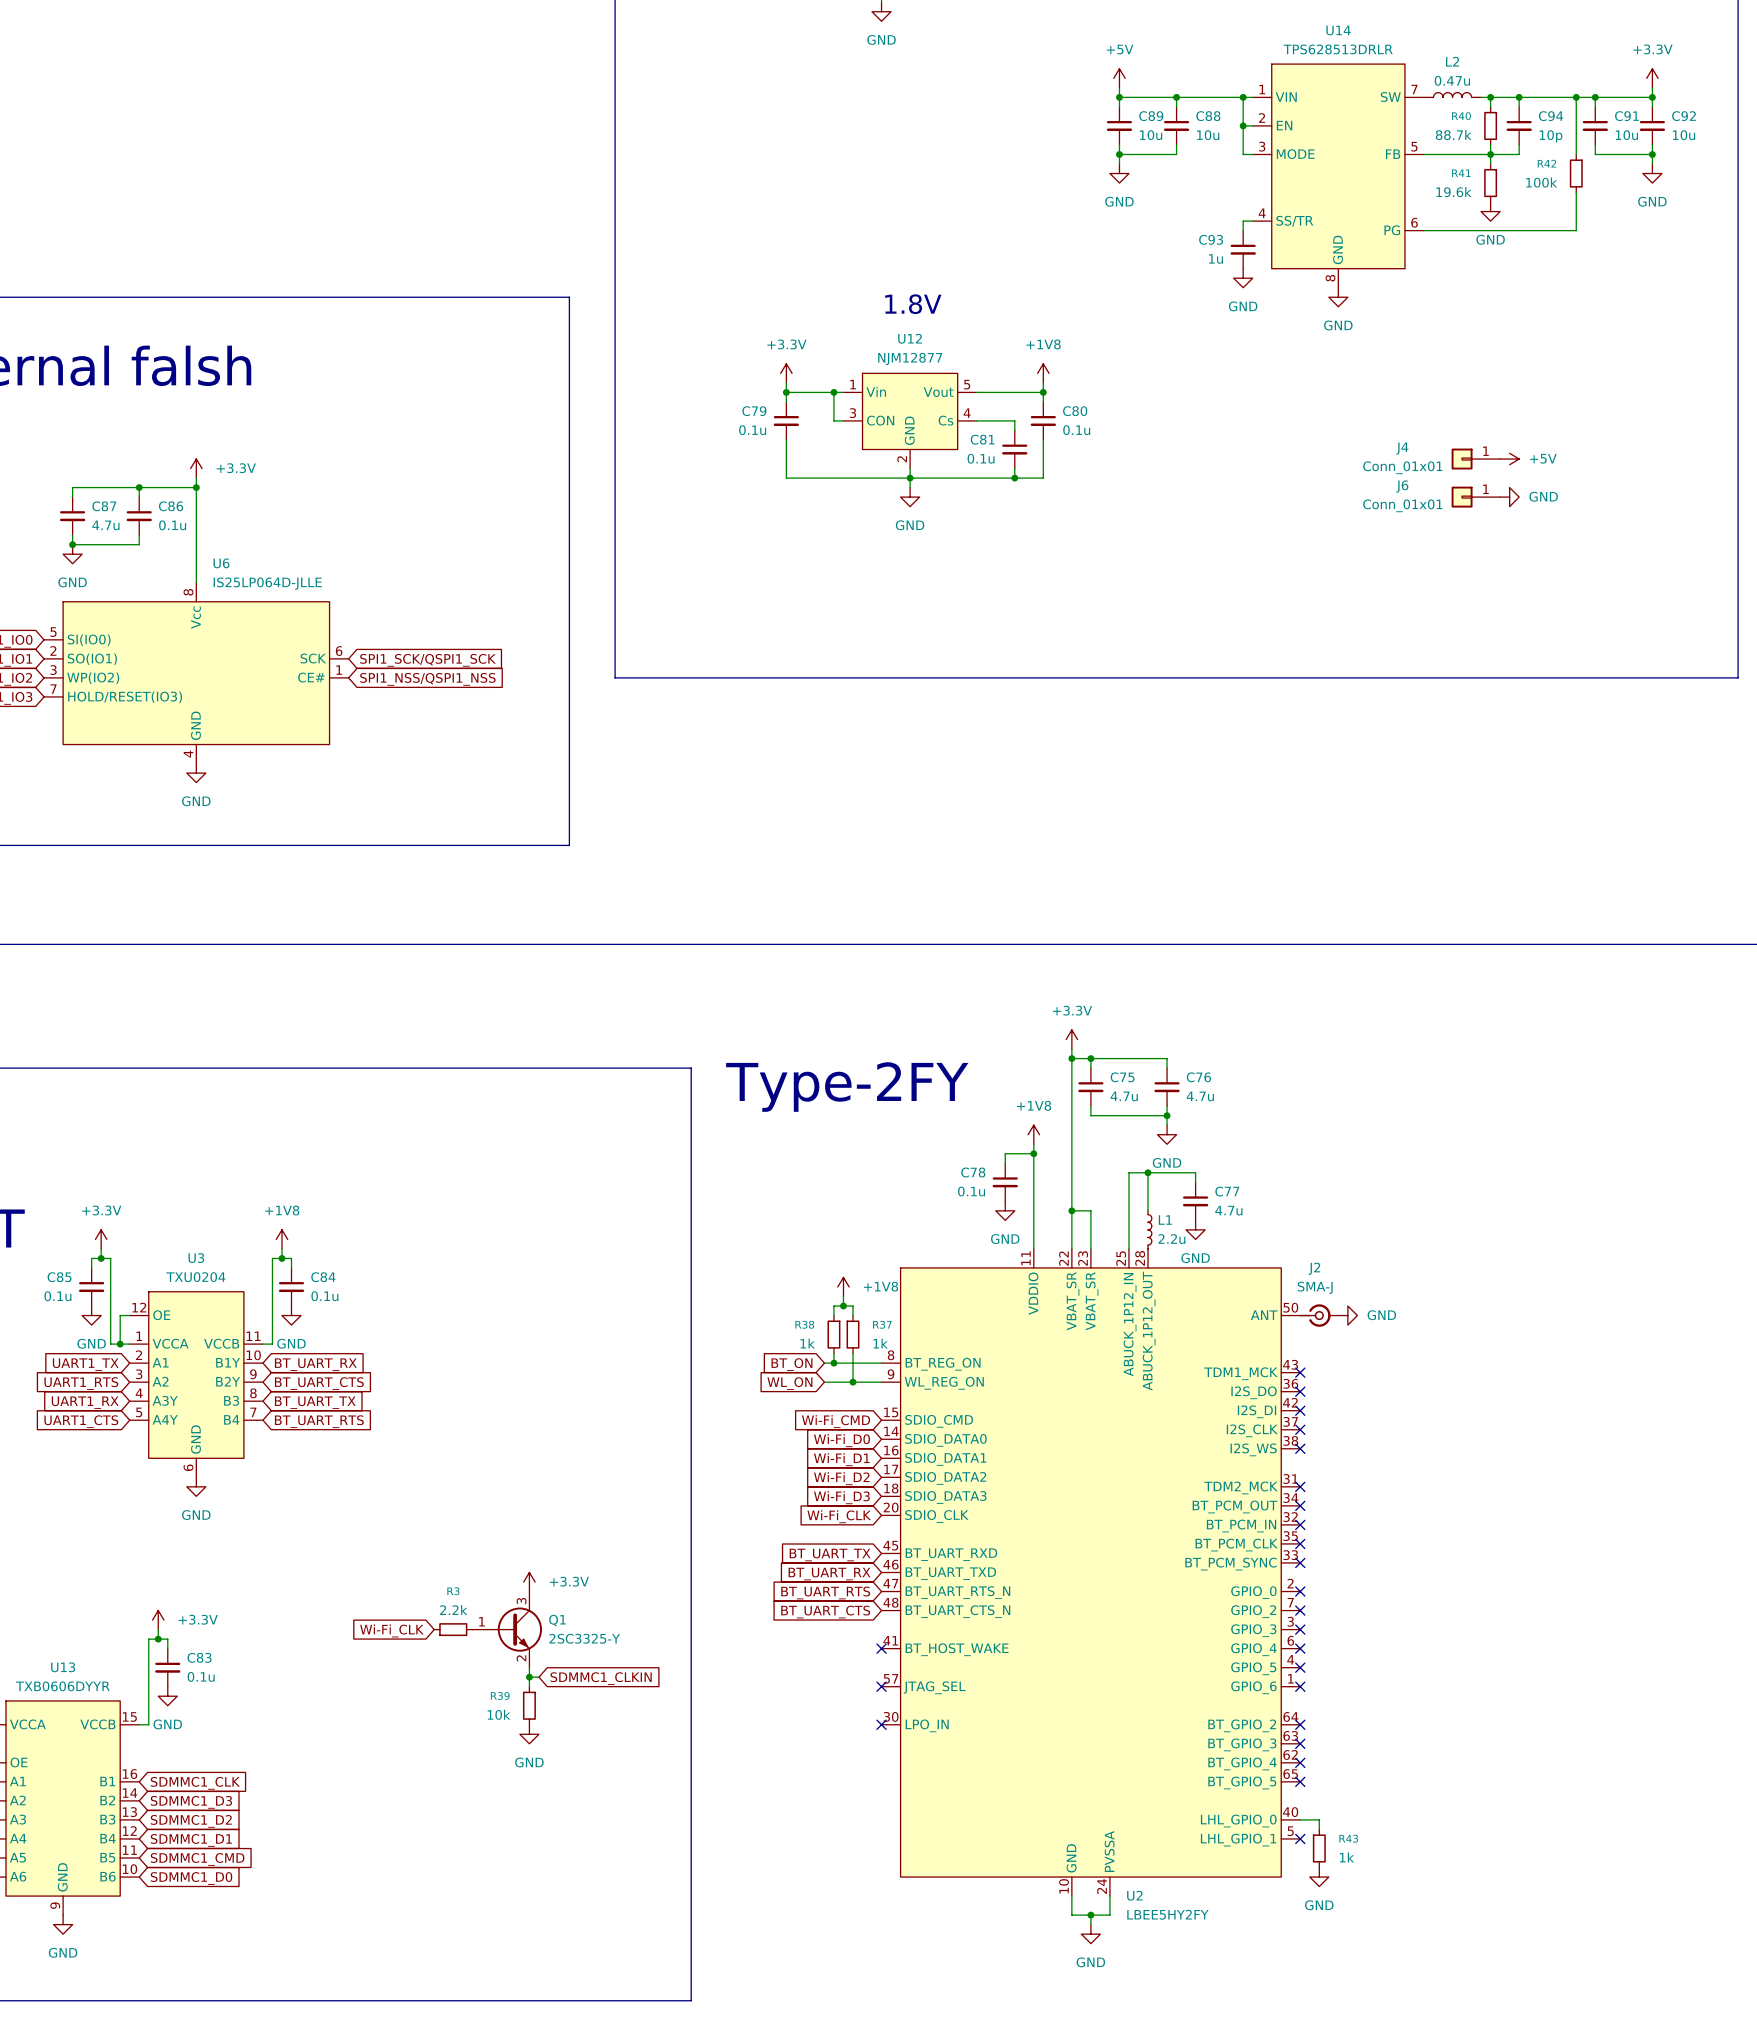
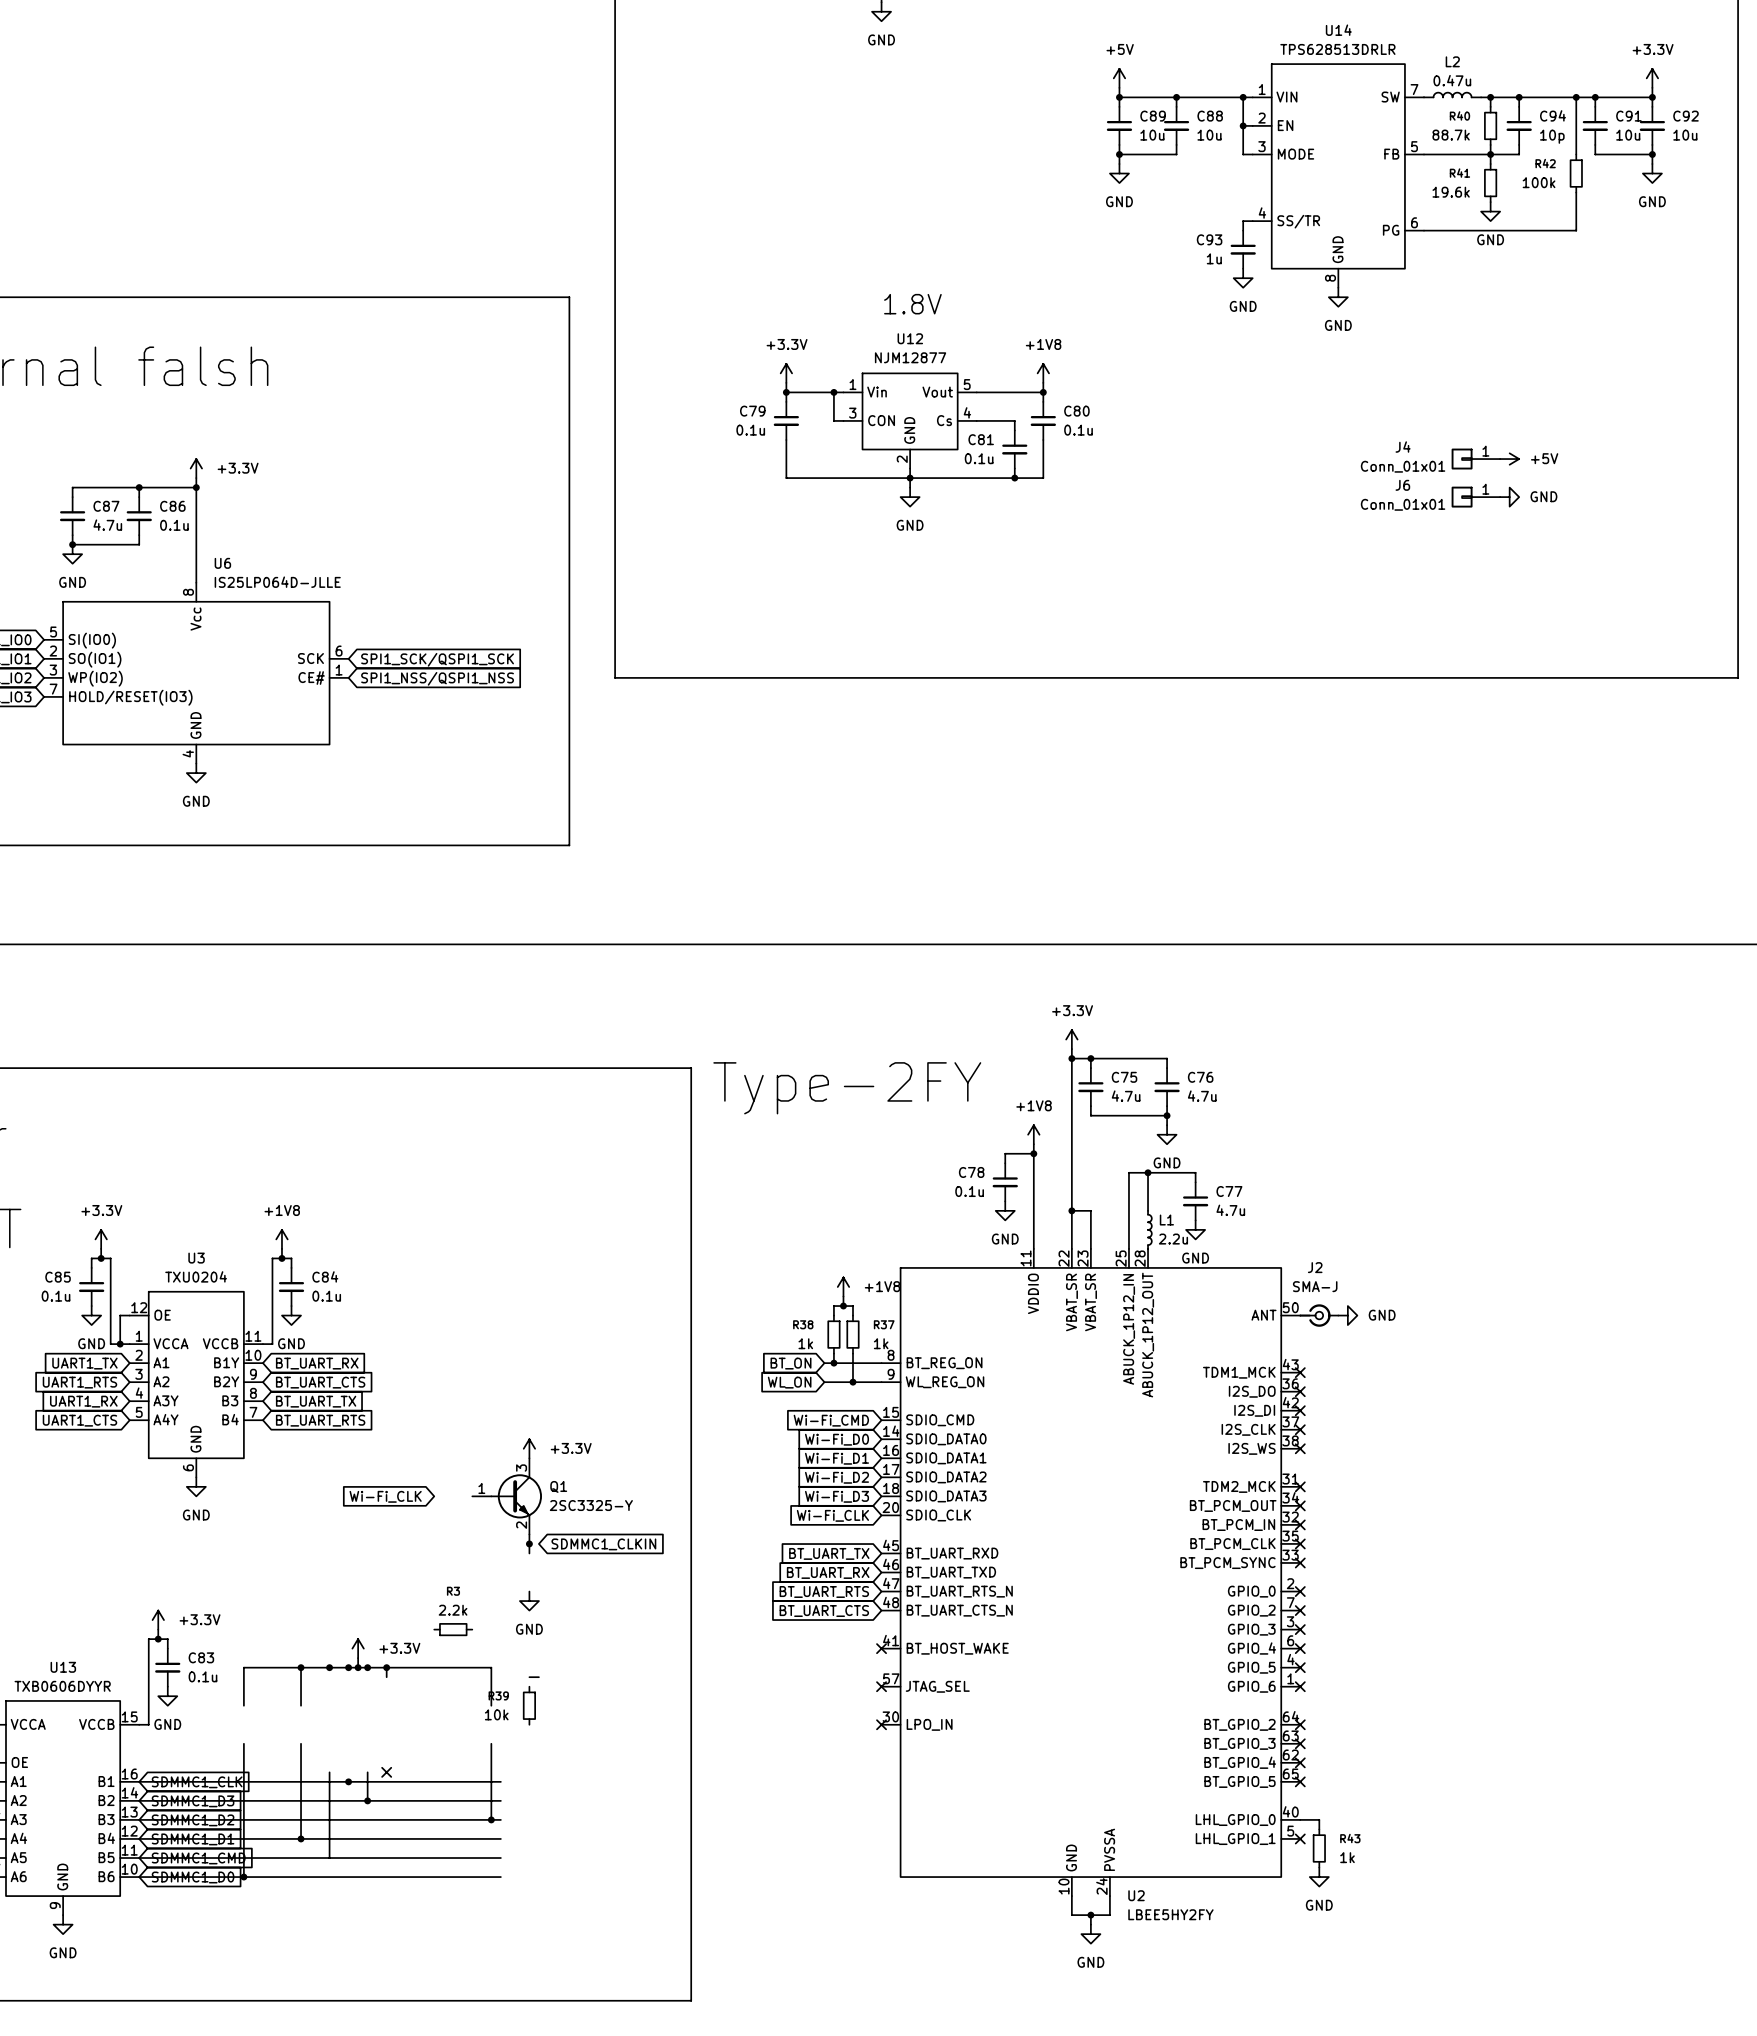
power symbol: none -> +3.3V (529, 1448)
junction: none -> (529, 1543)
power symbol: +3.3V (529, 1582) -> none
Q1 position: (507, 1629) -> (507, 1496)
global label position: Wi-Fi_CLK (391, 1630) -> Wi-Fi_CLK (385, 1496)
power symbol: none -> +3.3V (358, 1648)
wire: none -> (358, 1658) (358, 1667)
wire: none -> (301, 1667) (301, 1705)
junction: none -> (301, 1667)
junction: none -> (329, 1667)
junction: none -> (348, 1667)
junction: none -> (358, 1667)
junction: none -> (367, 1667)
wire: none -> (386, 1667) (386, 1677)
junction: none -> (386, 1667)
wire: (529, 1667) (529, 1686) -> (529, 1534) (529, 1553)
junction: (529, 1677) -> none
global label position: SDMMC1_CLKIN (601, 1678) -> SDMMC1_CLKIN (603, 1544)
wire: none -> (243, 1705) (243, 1667) (491, 1667) (491, 1705)
power symbol position: GND (529, 1734) -> GND (529, 1601)
wire: none -> (243, 1743) (243, 1877)
wire: none -> (301, 1743) (301, 1838)
wire: none -> (491, 1743) (491, 1819)
wire: none -> (329, 1772) (329, 1858)
wire: none -> (367, 1772) (367, 1800)
no-connect mark: none -> (386, 1772)
wire: none -> (139, 1781) (500, 1781)
junction: none -> (348, 1781)
wire: none -> (139, 1800) (500, 1800)
junction: none -> (367, 1800)
wire: none -> (139, 1819) (500, 1819)
junction: none -> (491, 1819)
wire: none -> (139, 1838) (500, 1838)
junction: none -> (301, 1838)
wire: none -> (139, 1858) (500, 1858)
wire: none -> (139, 1877) (500, 1877)
junction: none -> (243, 1877)

